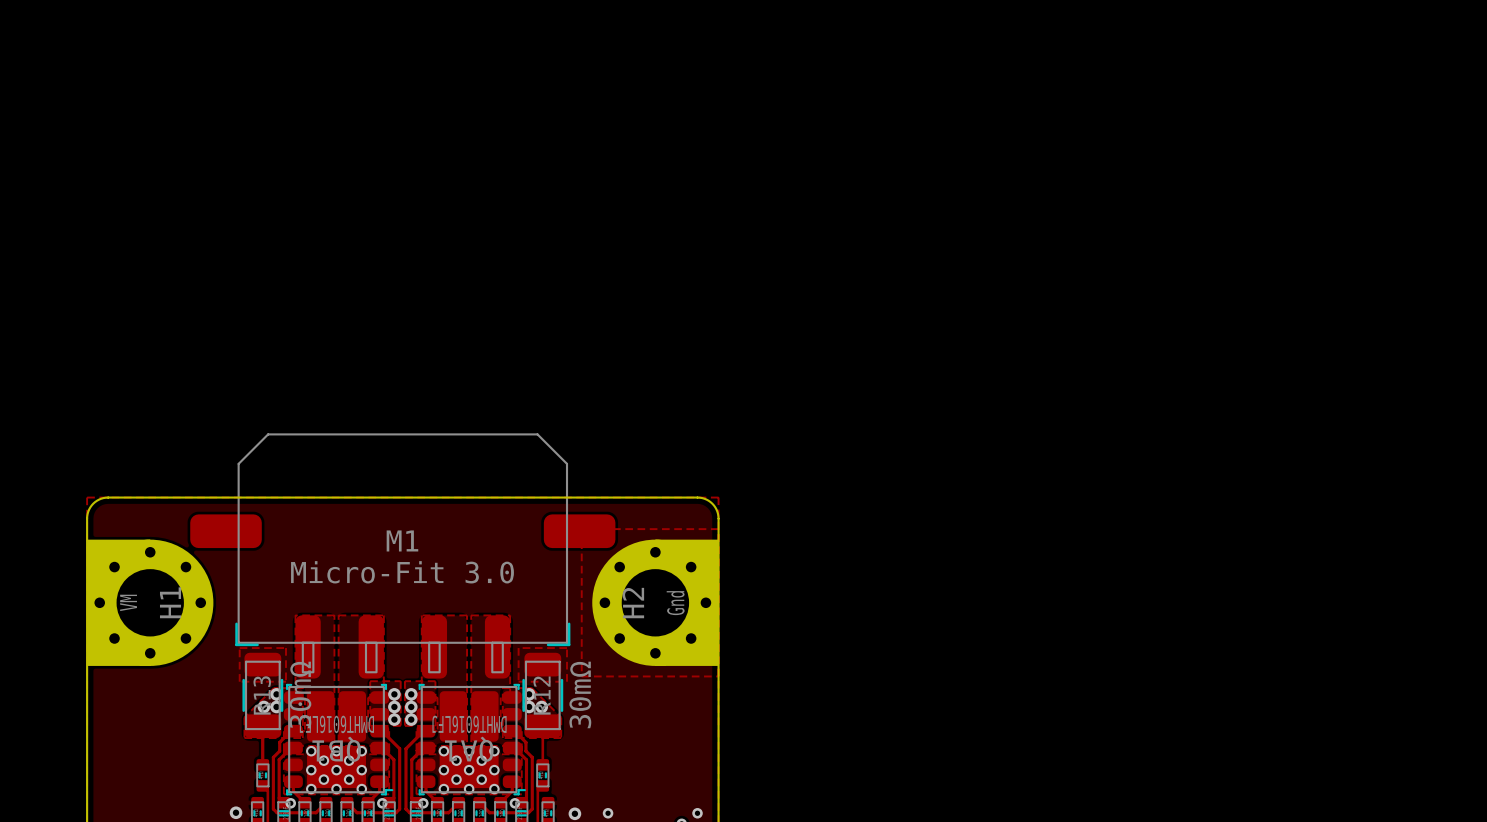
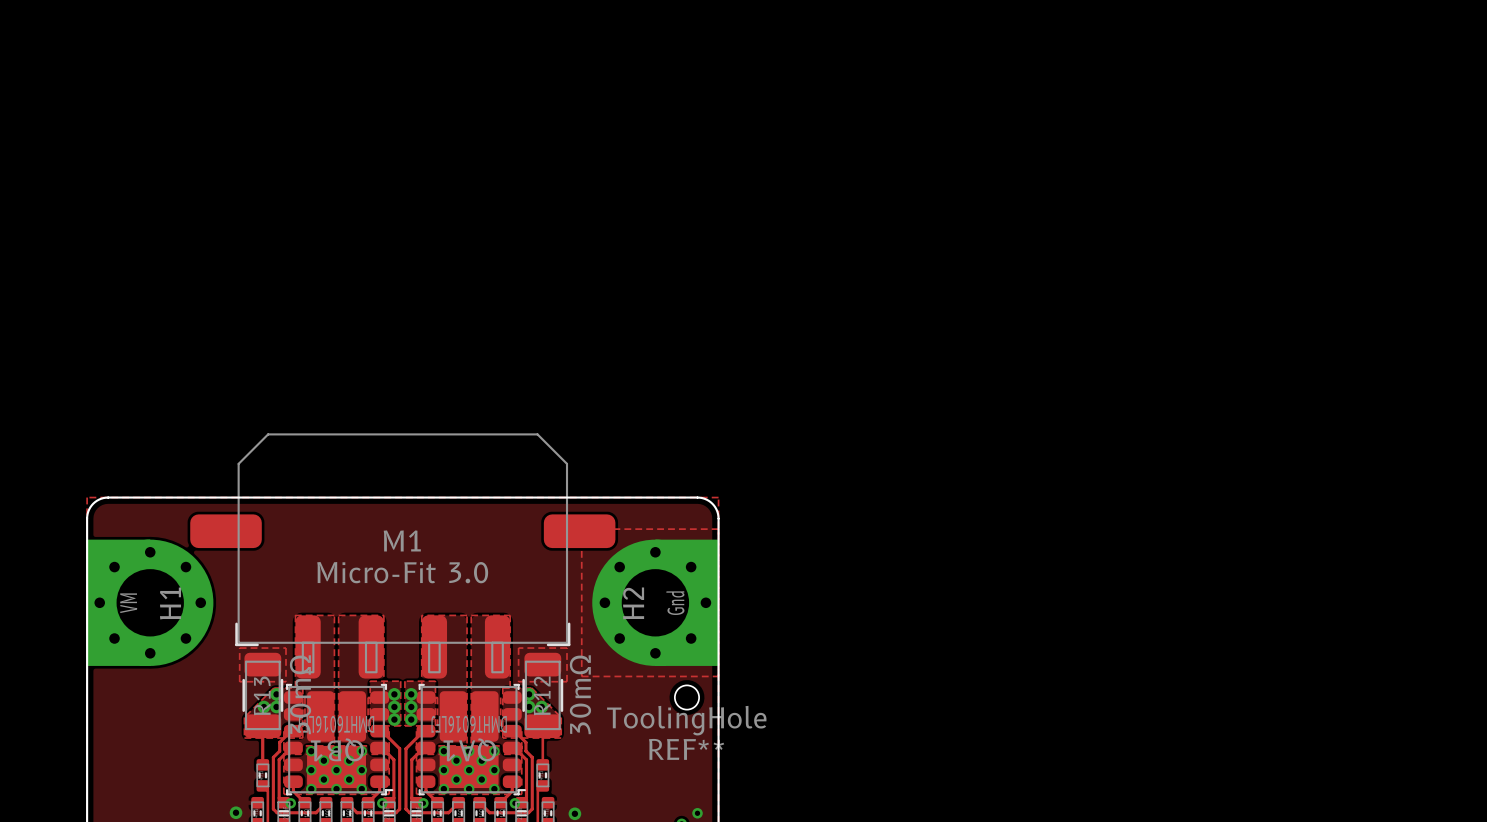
REF**: none -> ToolingHole (686, 697)
via: (608, 813) -> none

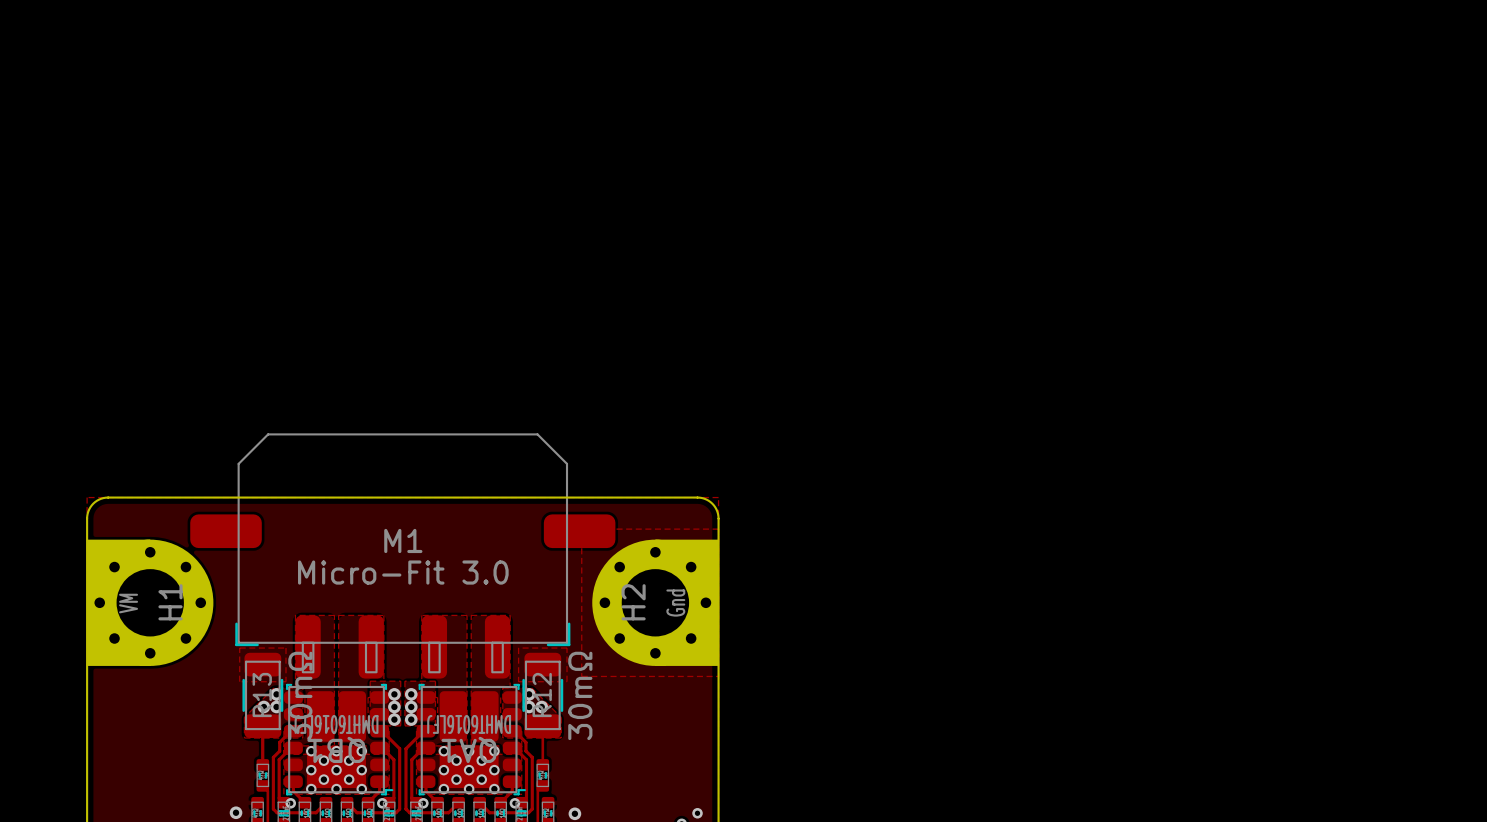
REF**: ToolingHole (686, 697) -> none

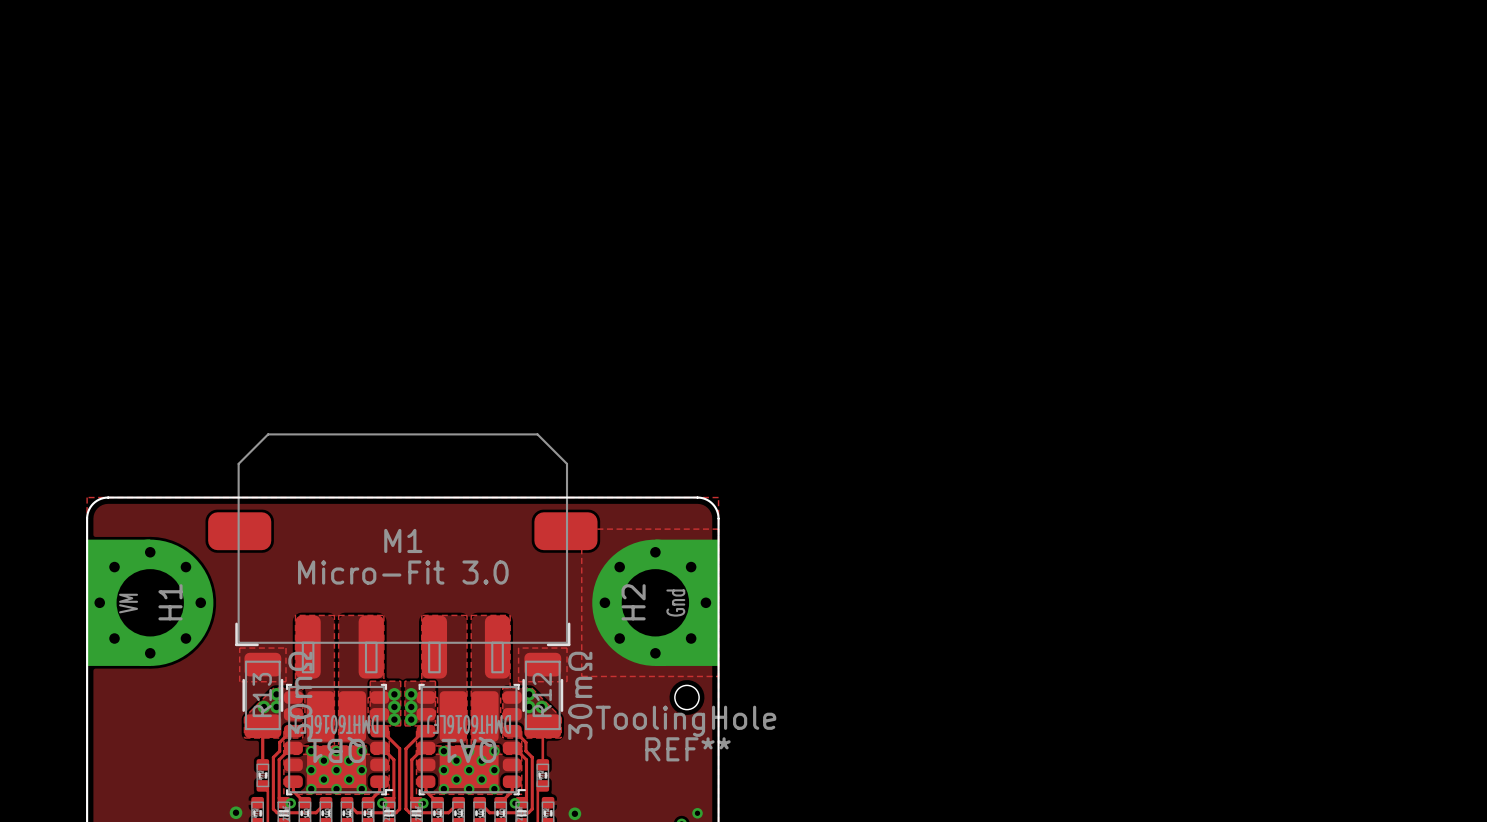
M1 footprint: [190, 433, 616, 679] -> [208, 433, 598, 679]
REF**: none -> ToolingHole (686, 697)

